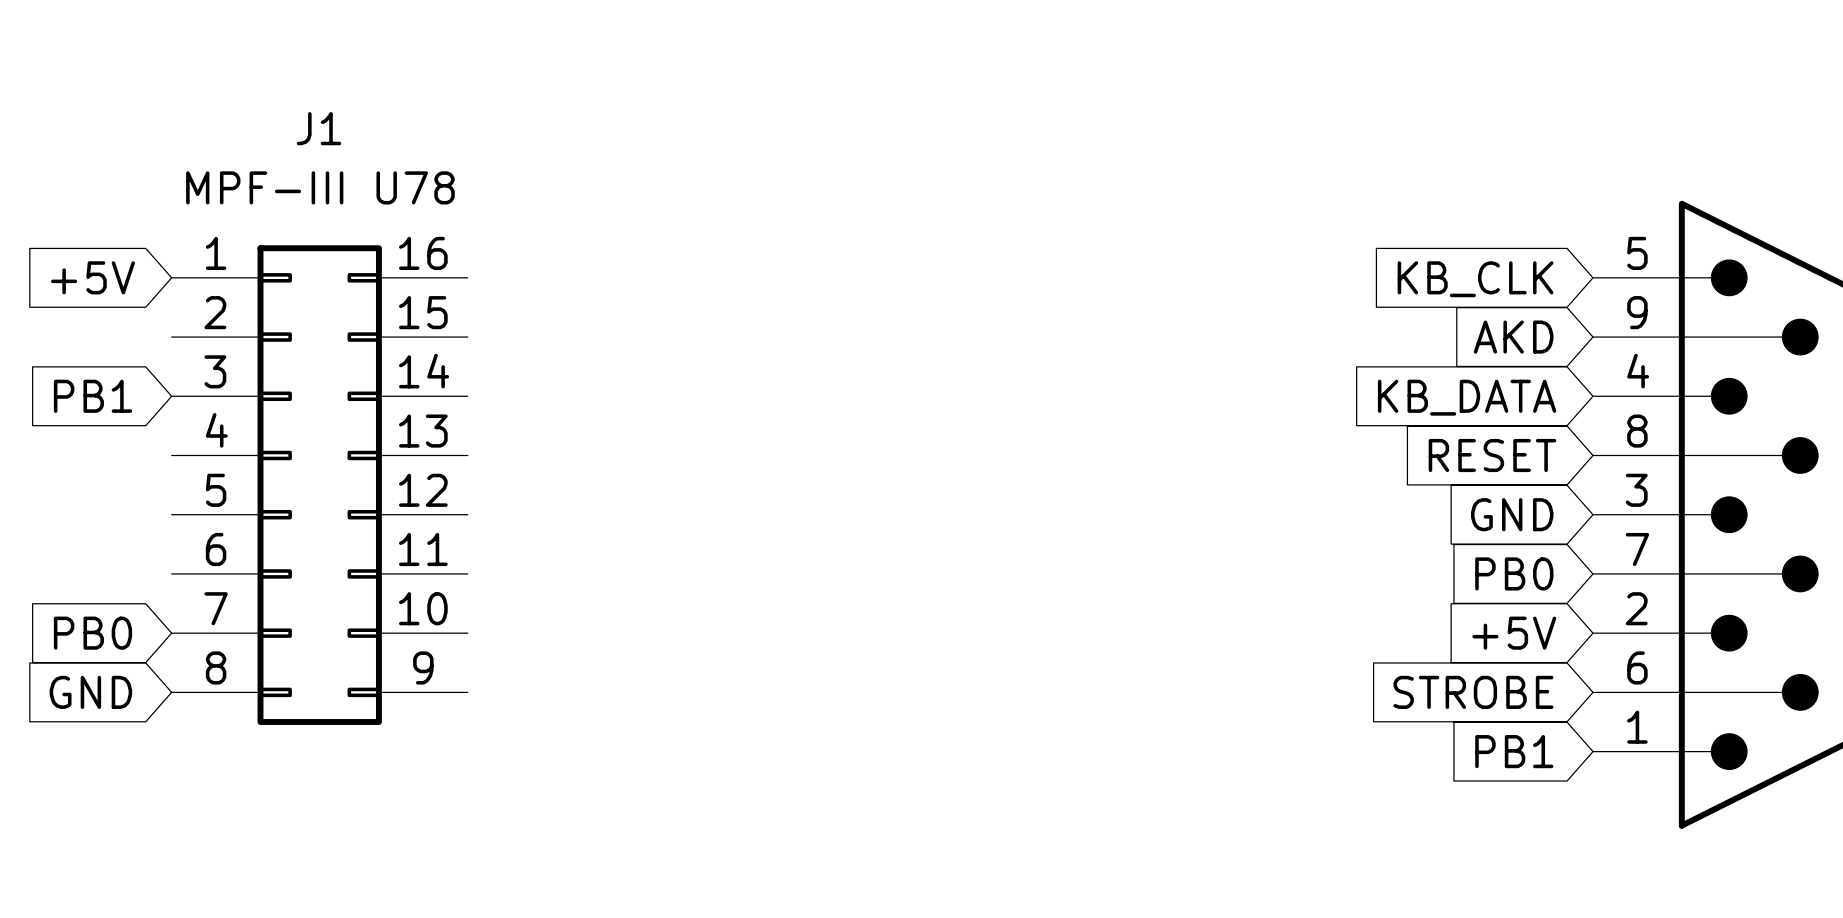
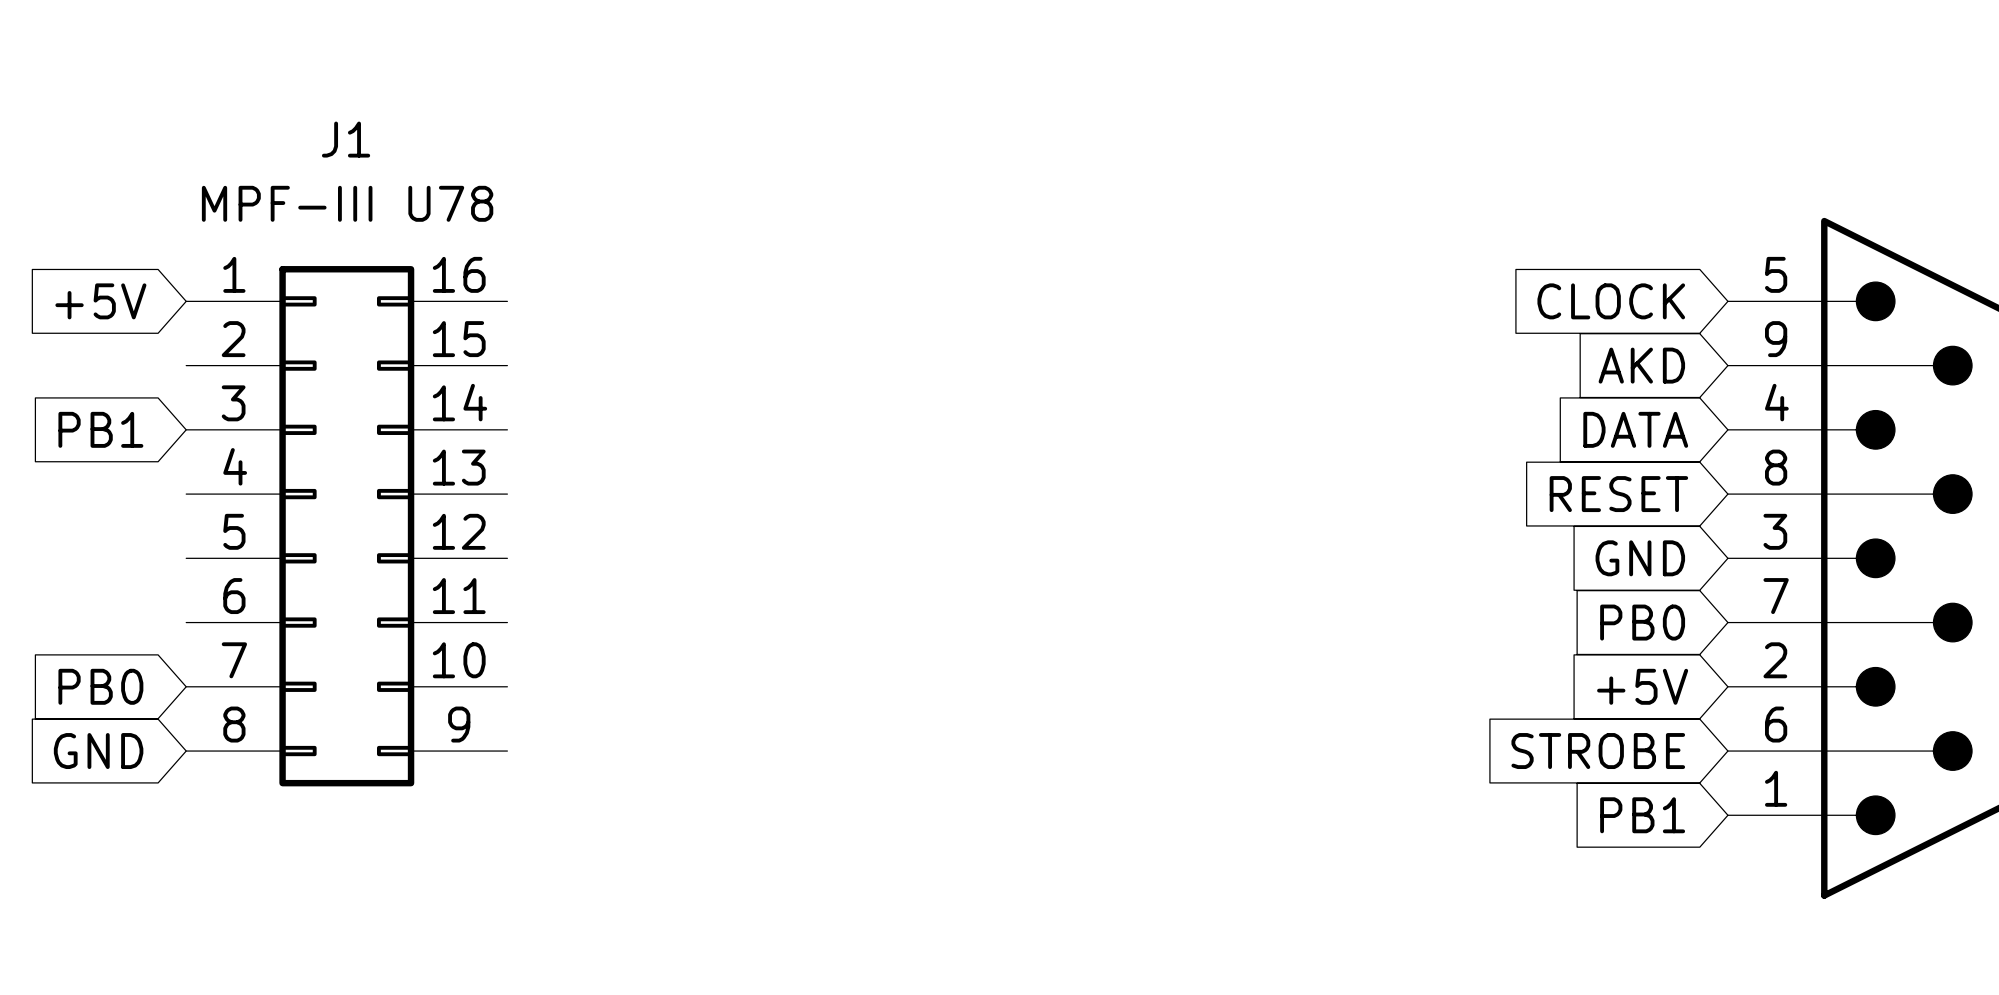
global label: KB_CLK (1475, 279) -> CLOCK (1611, 301)
global label: KB_DATA (1467, 397) -> DATA (1635, 429)

